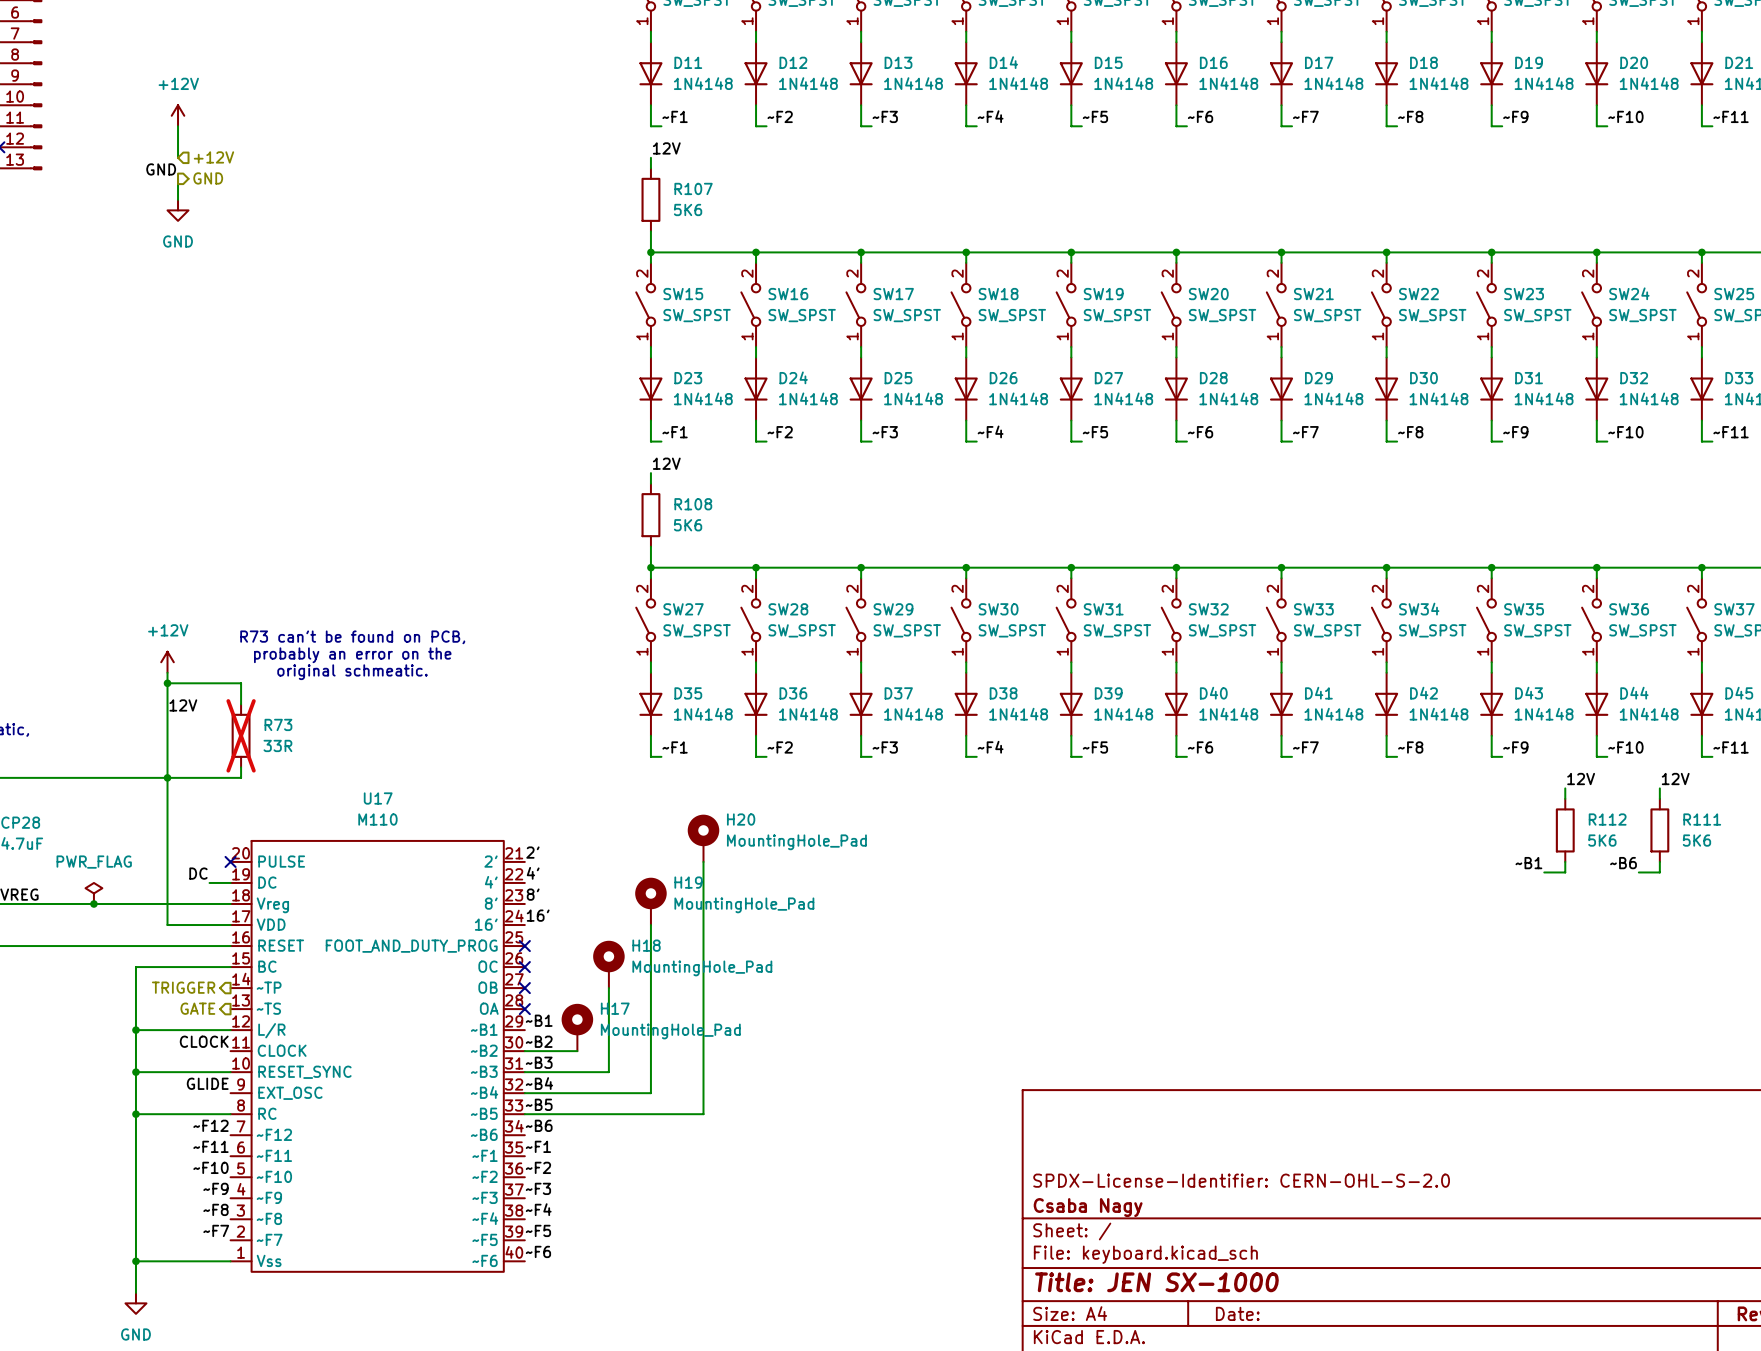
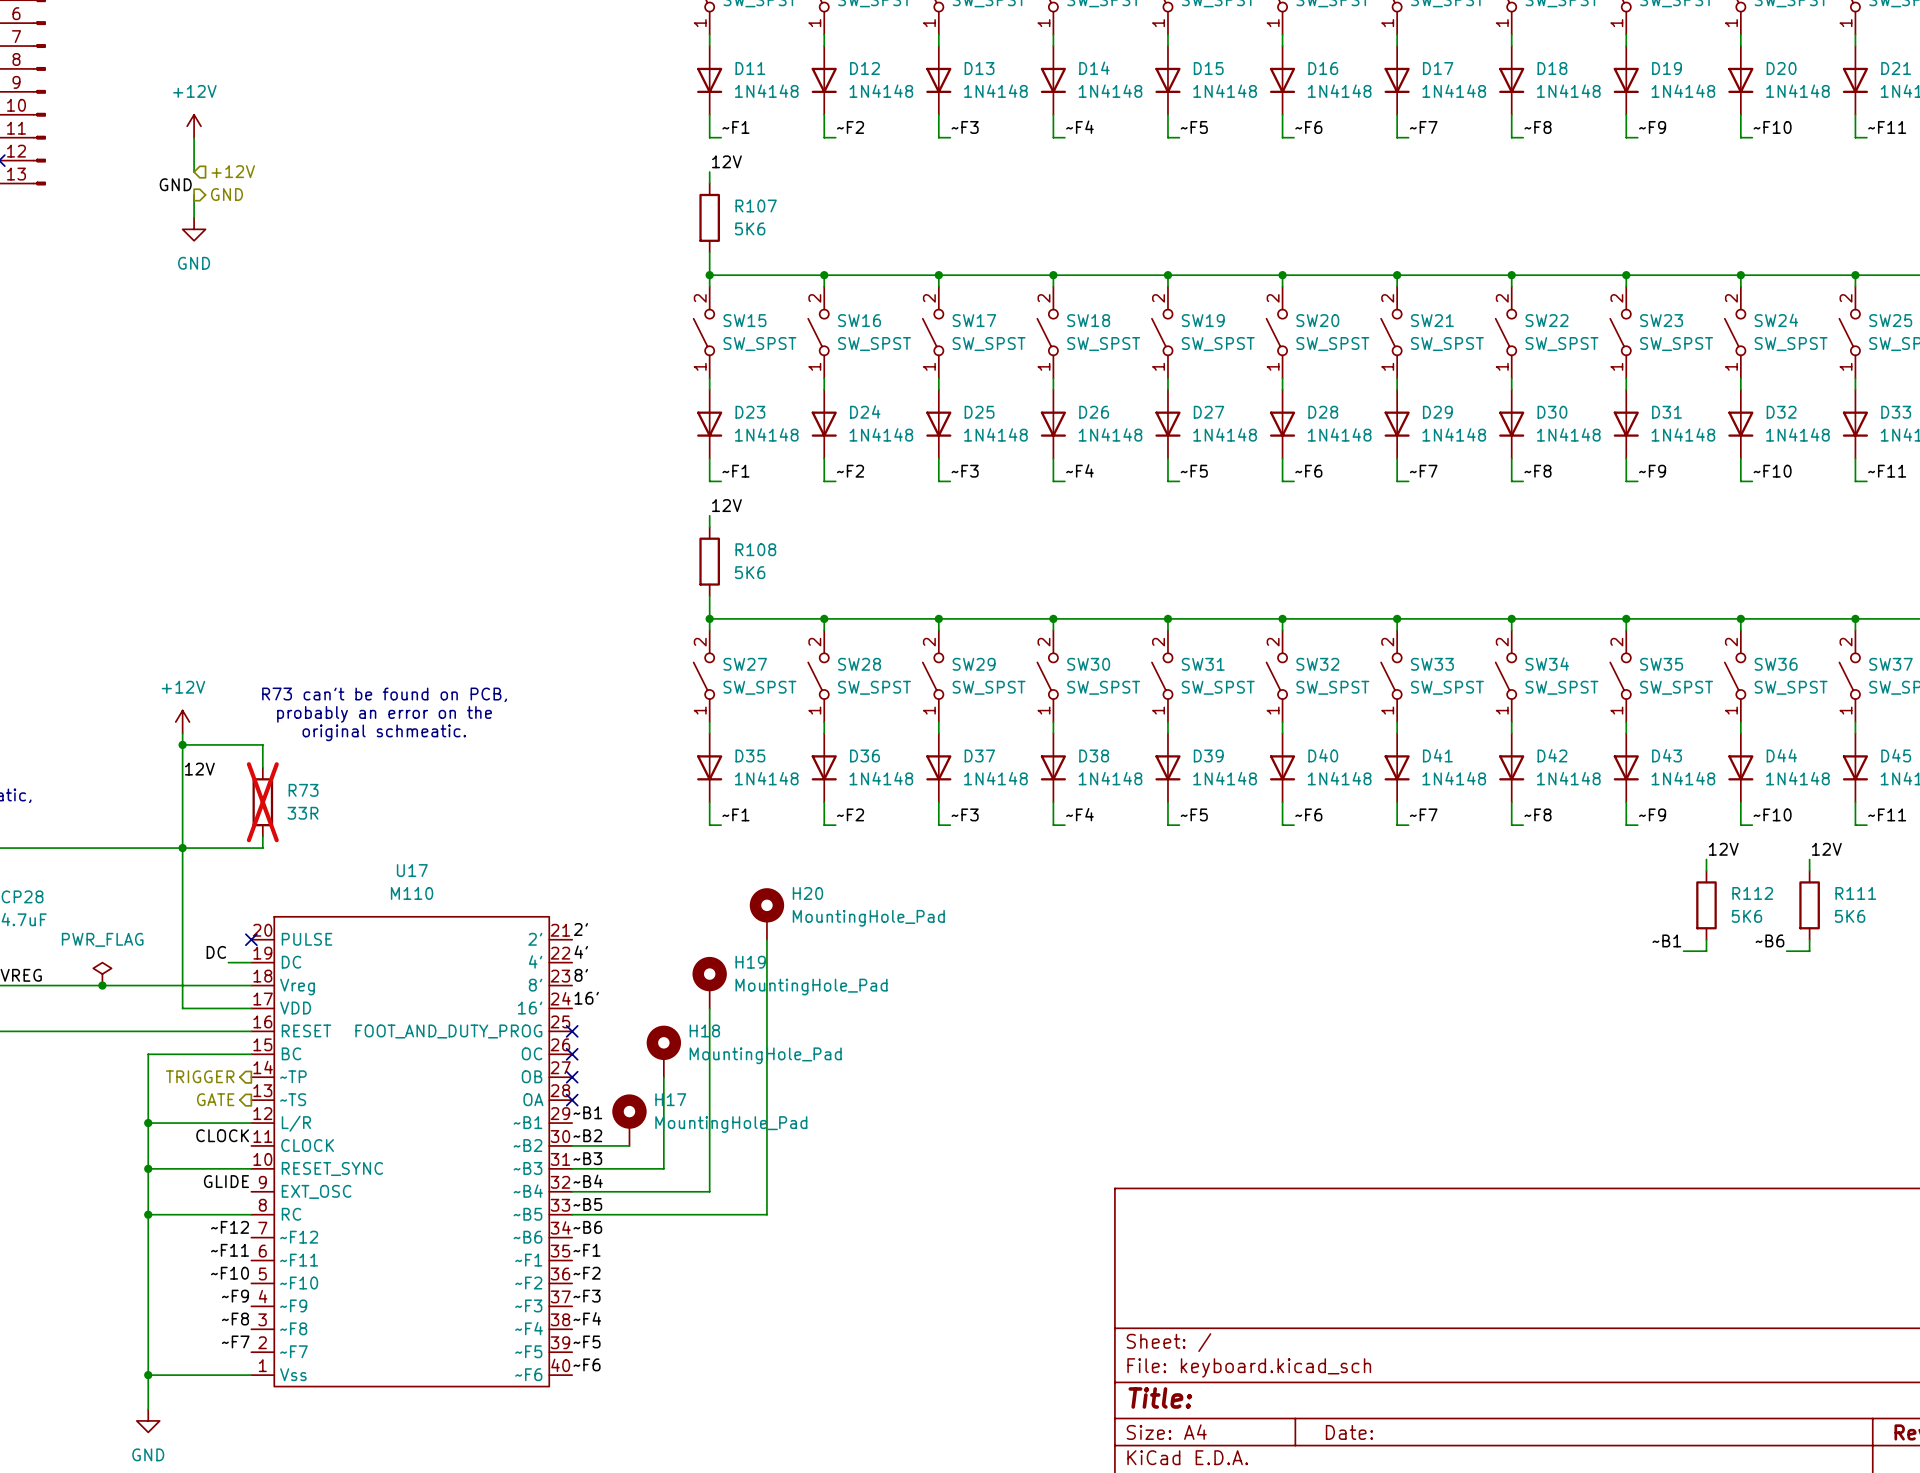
title block: SPDX-License-Identifier: CERN-OHL-S-2.0 (1241, 1180) -> none
title block: Csaba Nagy (1088, 1207) -> none
title block: Title: JEN SX-1000 (1156, 1282) -> Title: (1160, 1397)

